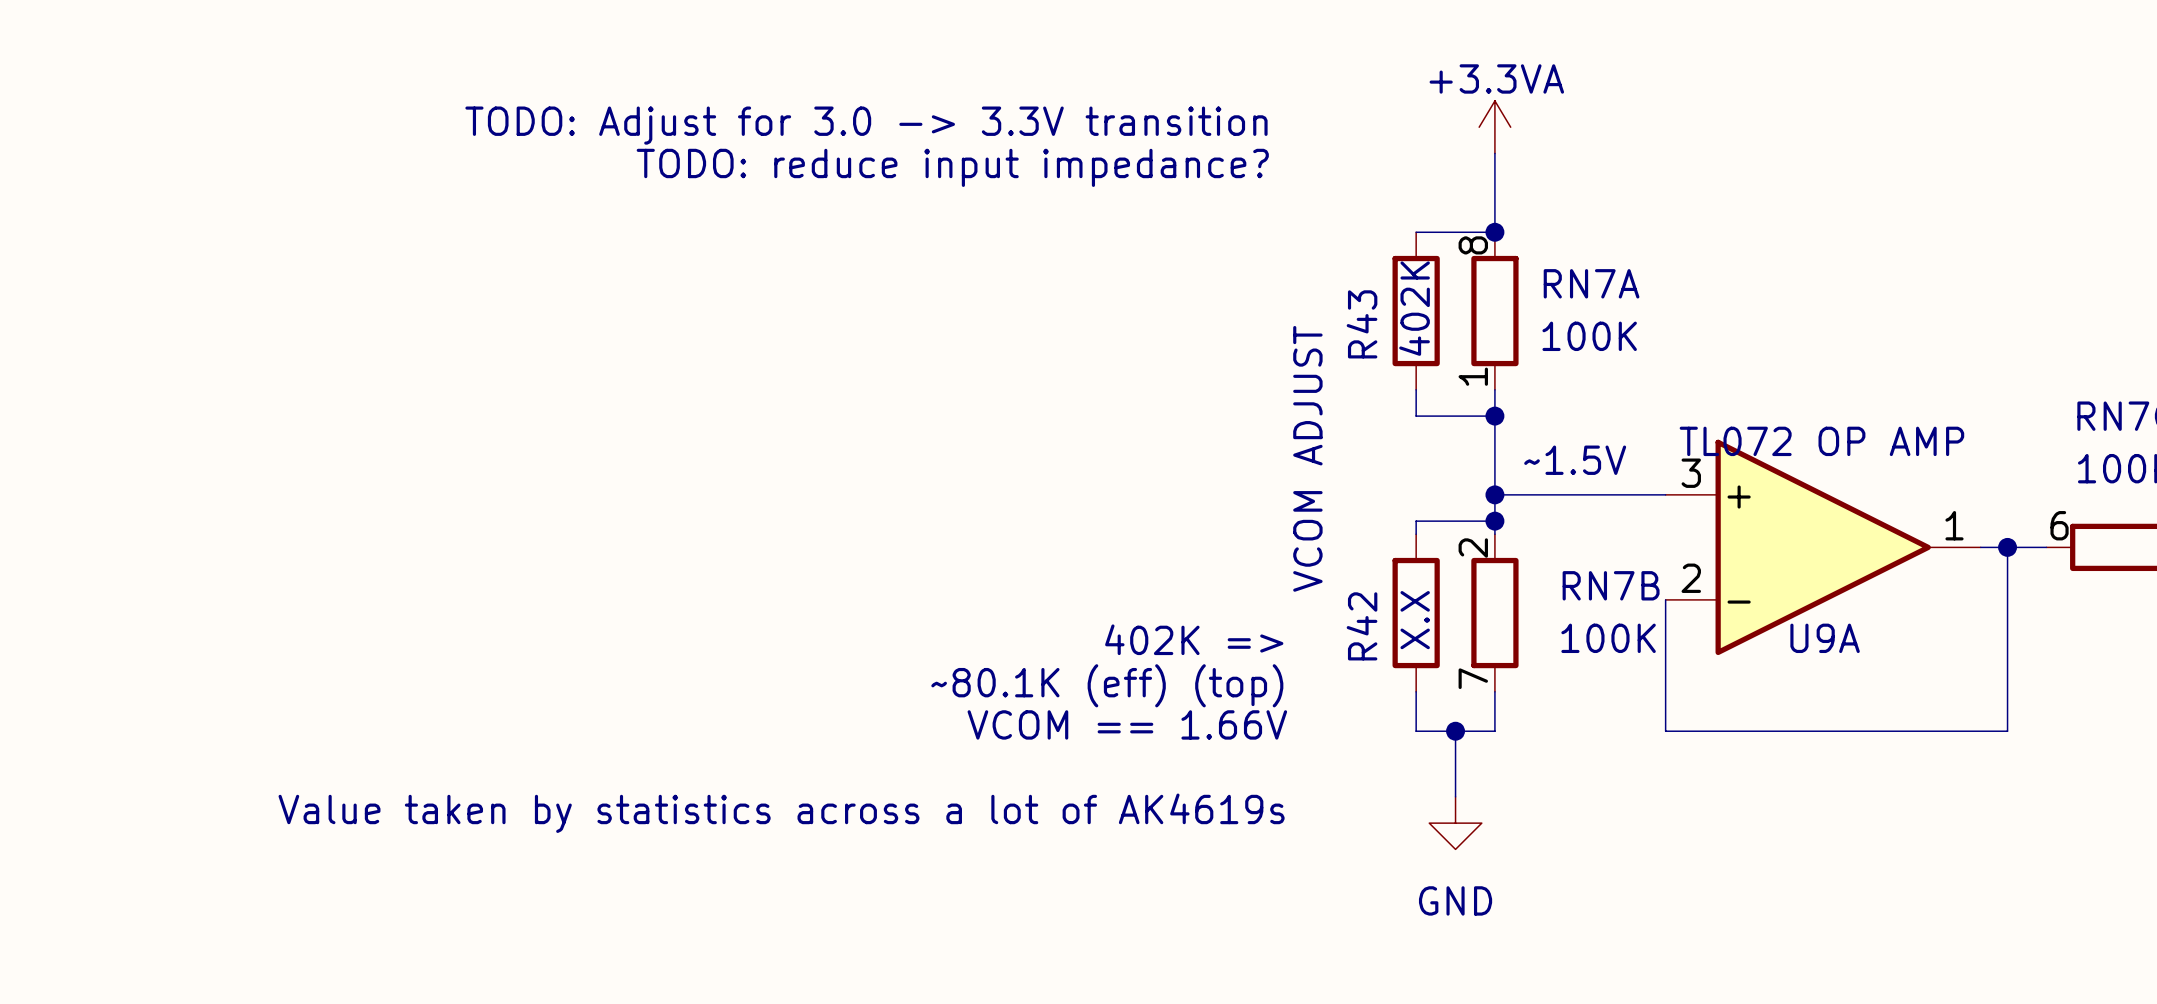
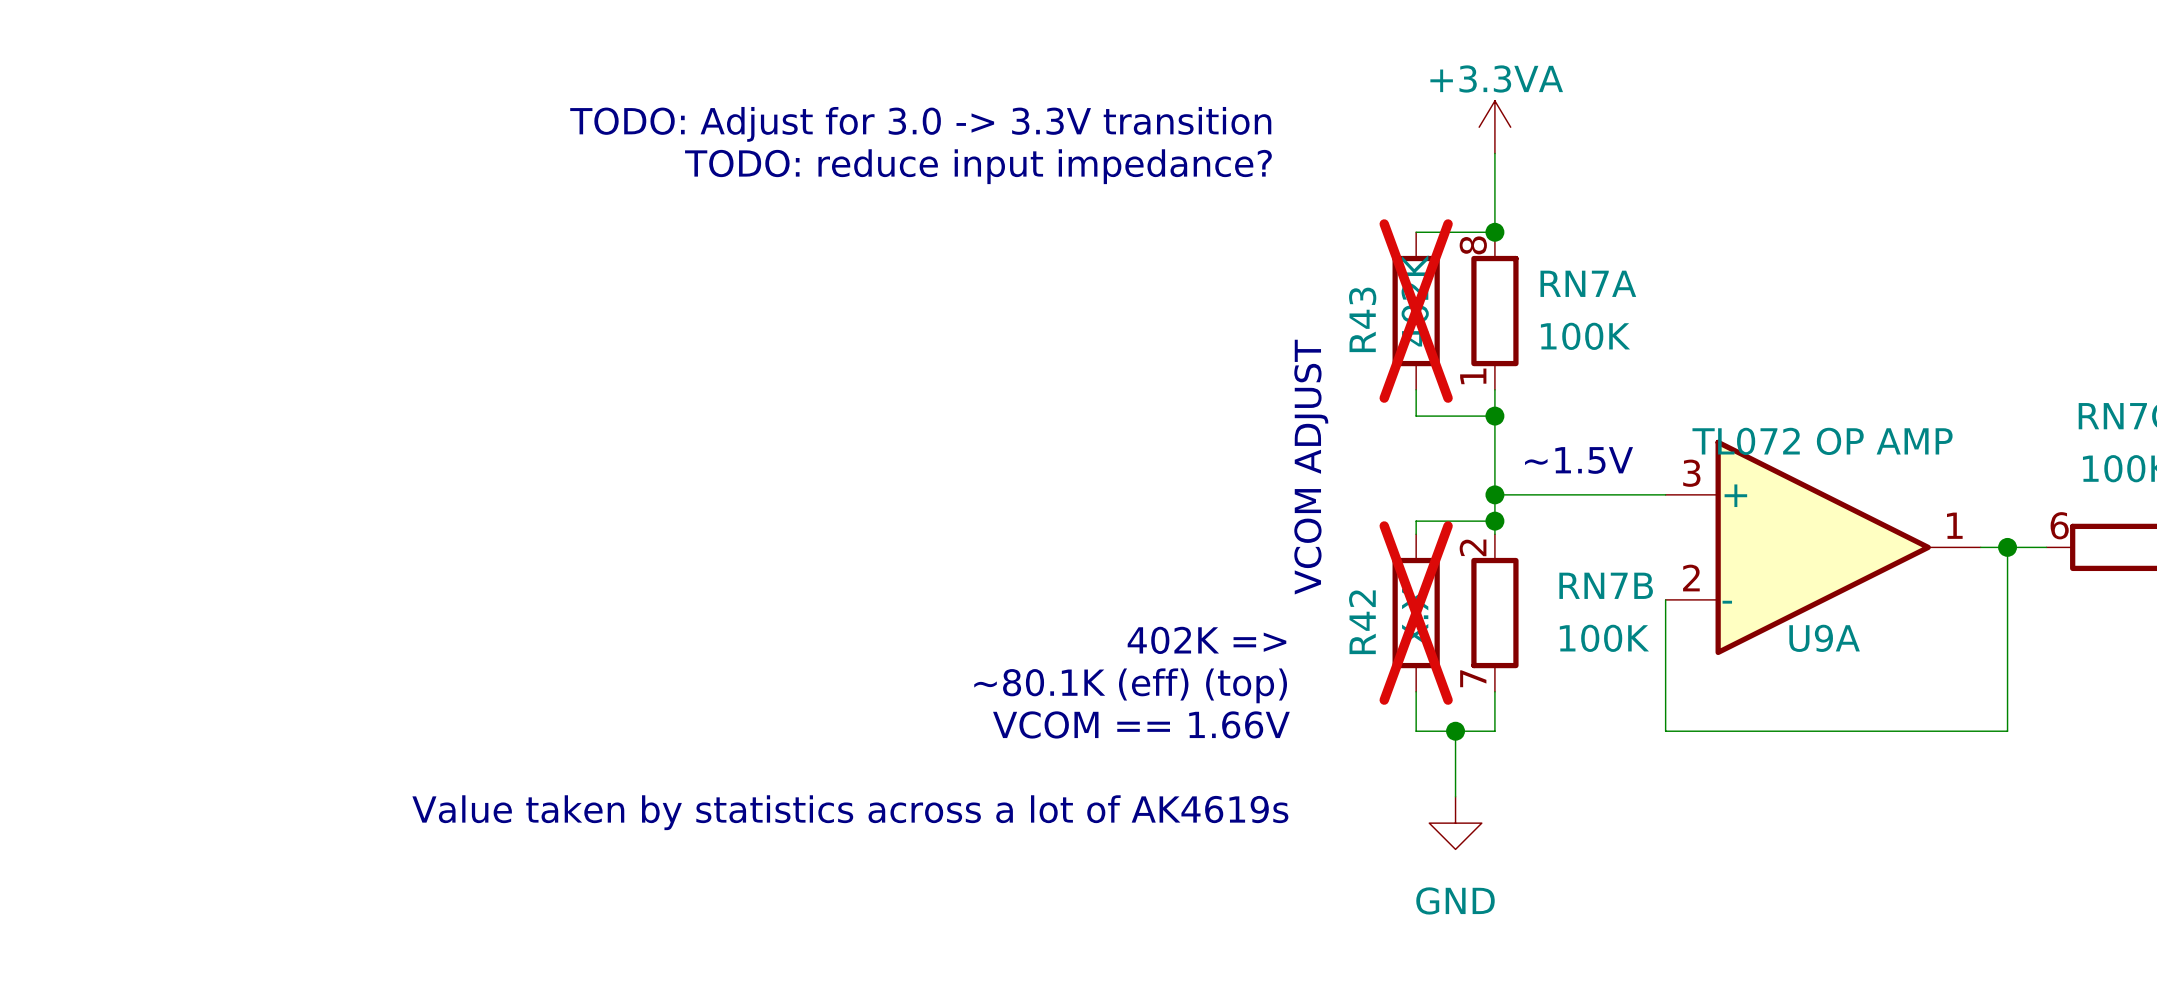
R43 do-not-place cross: none -> (1416, 311)
R42 do-not-place cross: none -> (1416, 613)

